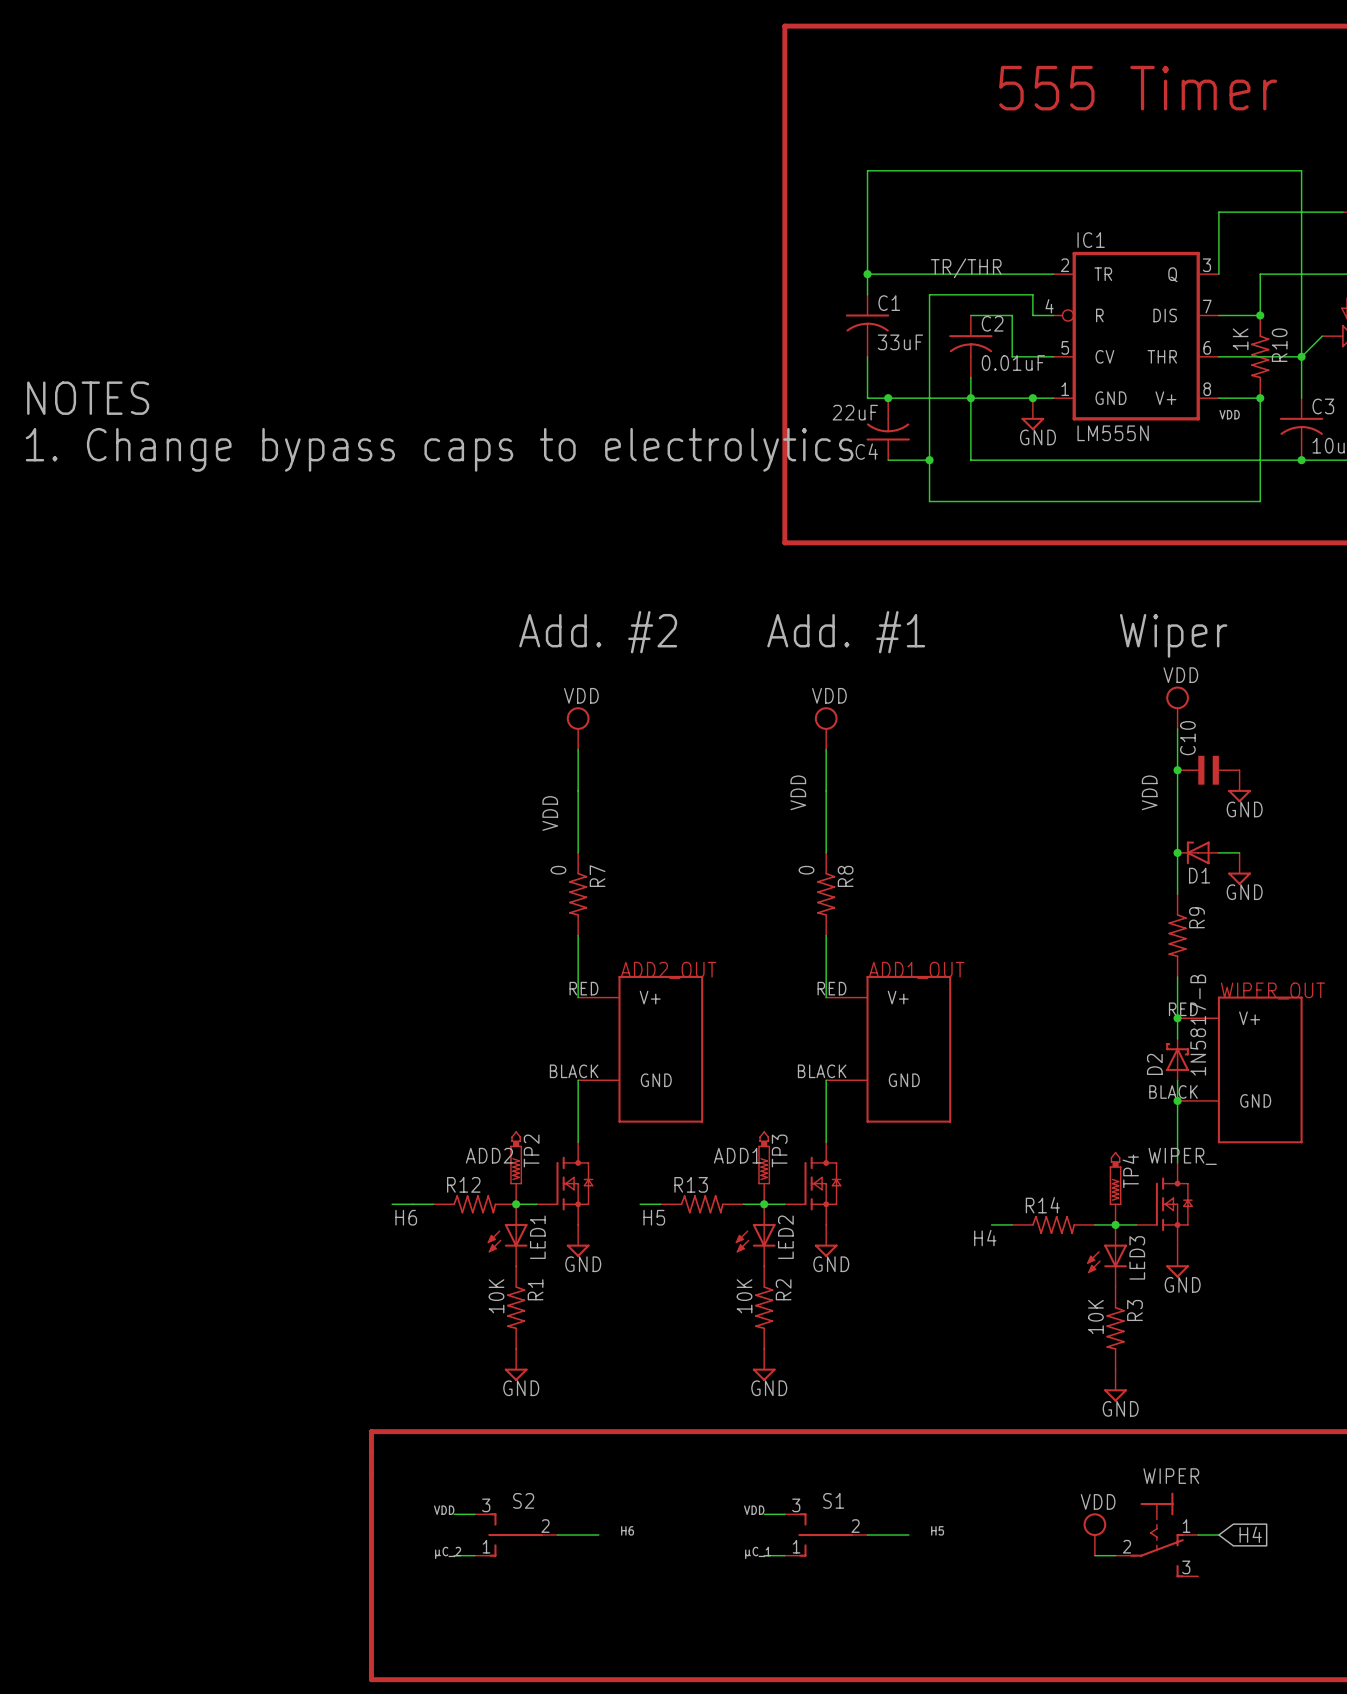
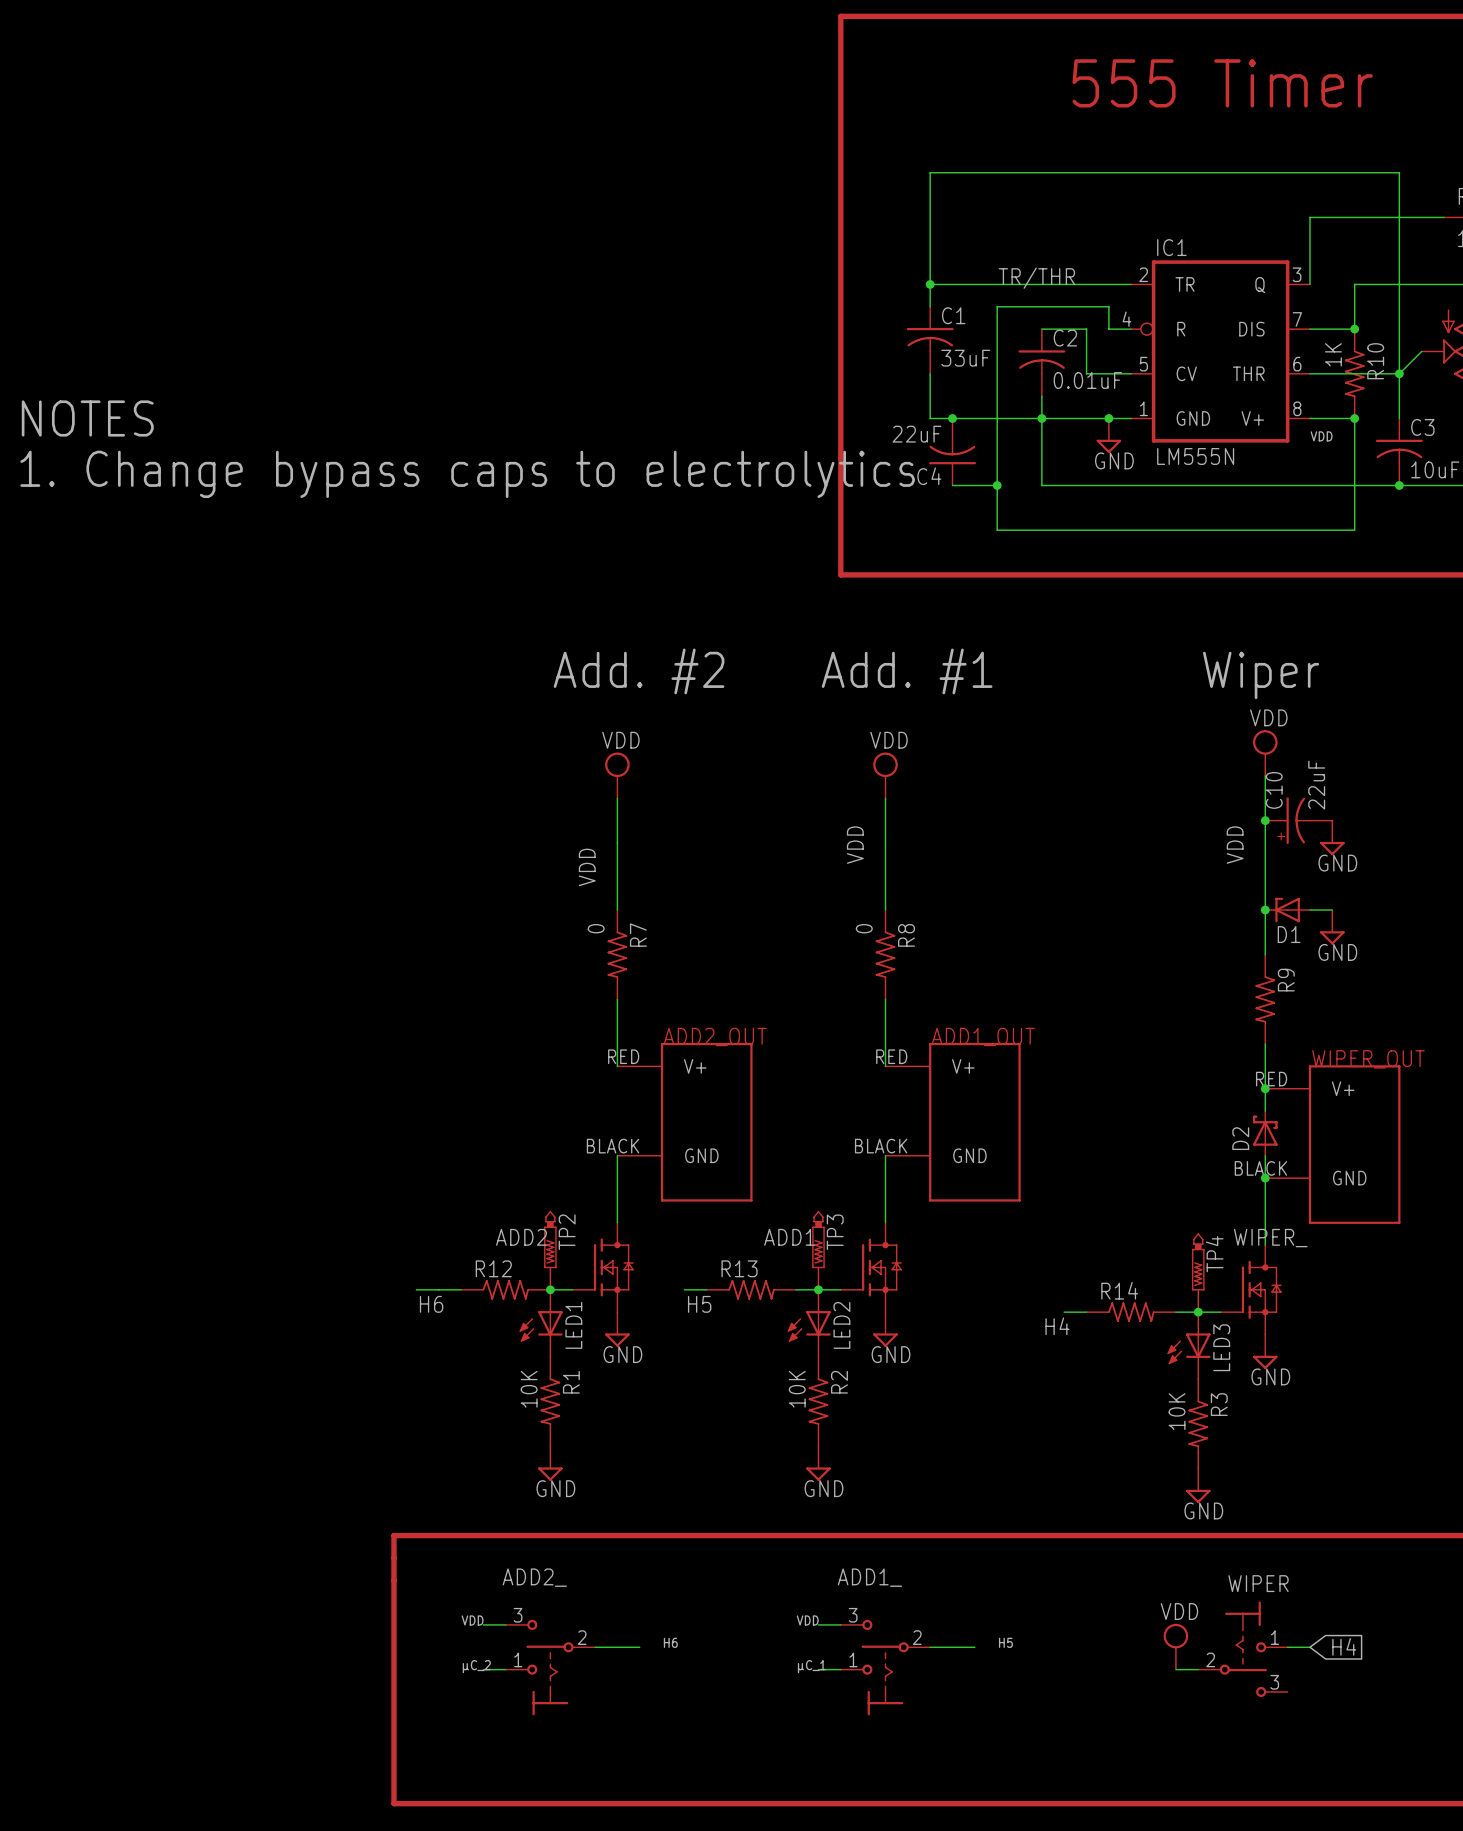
C10 value: none -> 22uF (1316, 785)
C10 symbol: [1177, 755, 1240, 785] -> [1265, 797, 1333, 845]
D2 value: 1N5817-B (1198, 1025) -> none
WIPER symbol: [1115, 1492, 1199, 1578] -> [1198, 1601, 1288, 1698]
S2: (516, 1535) -> none
S1: (826, 1535) -> none
ADD2_: none -> (550, 1667)
ADD1_: none -> (885, 1667)

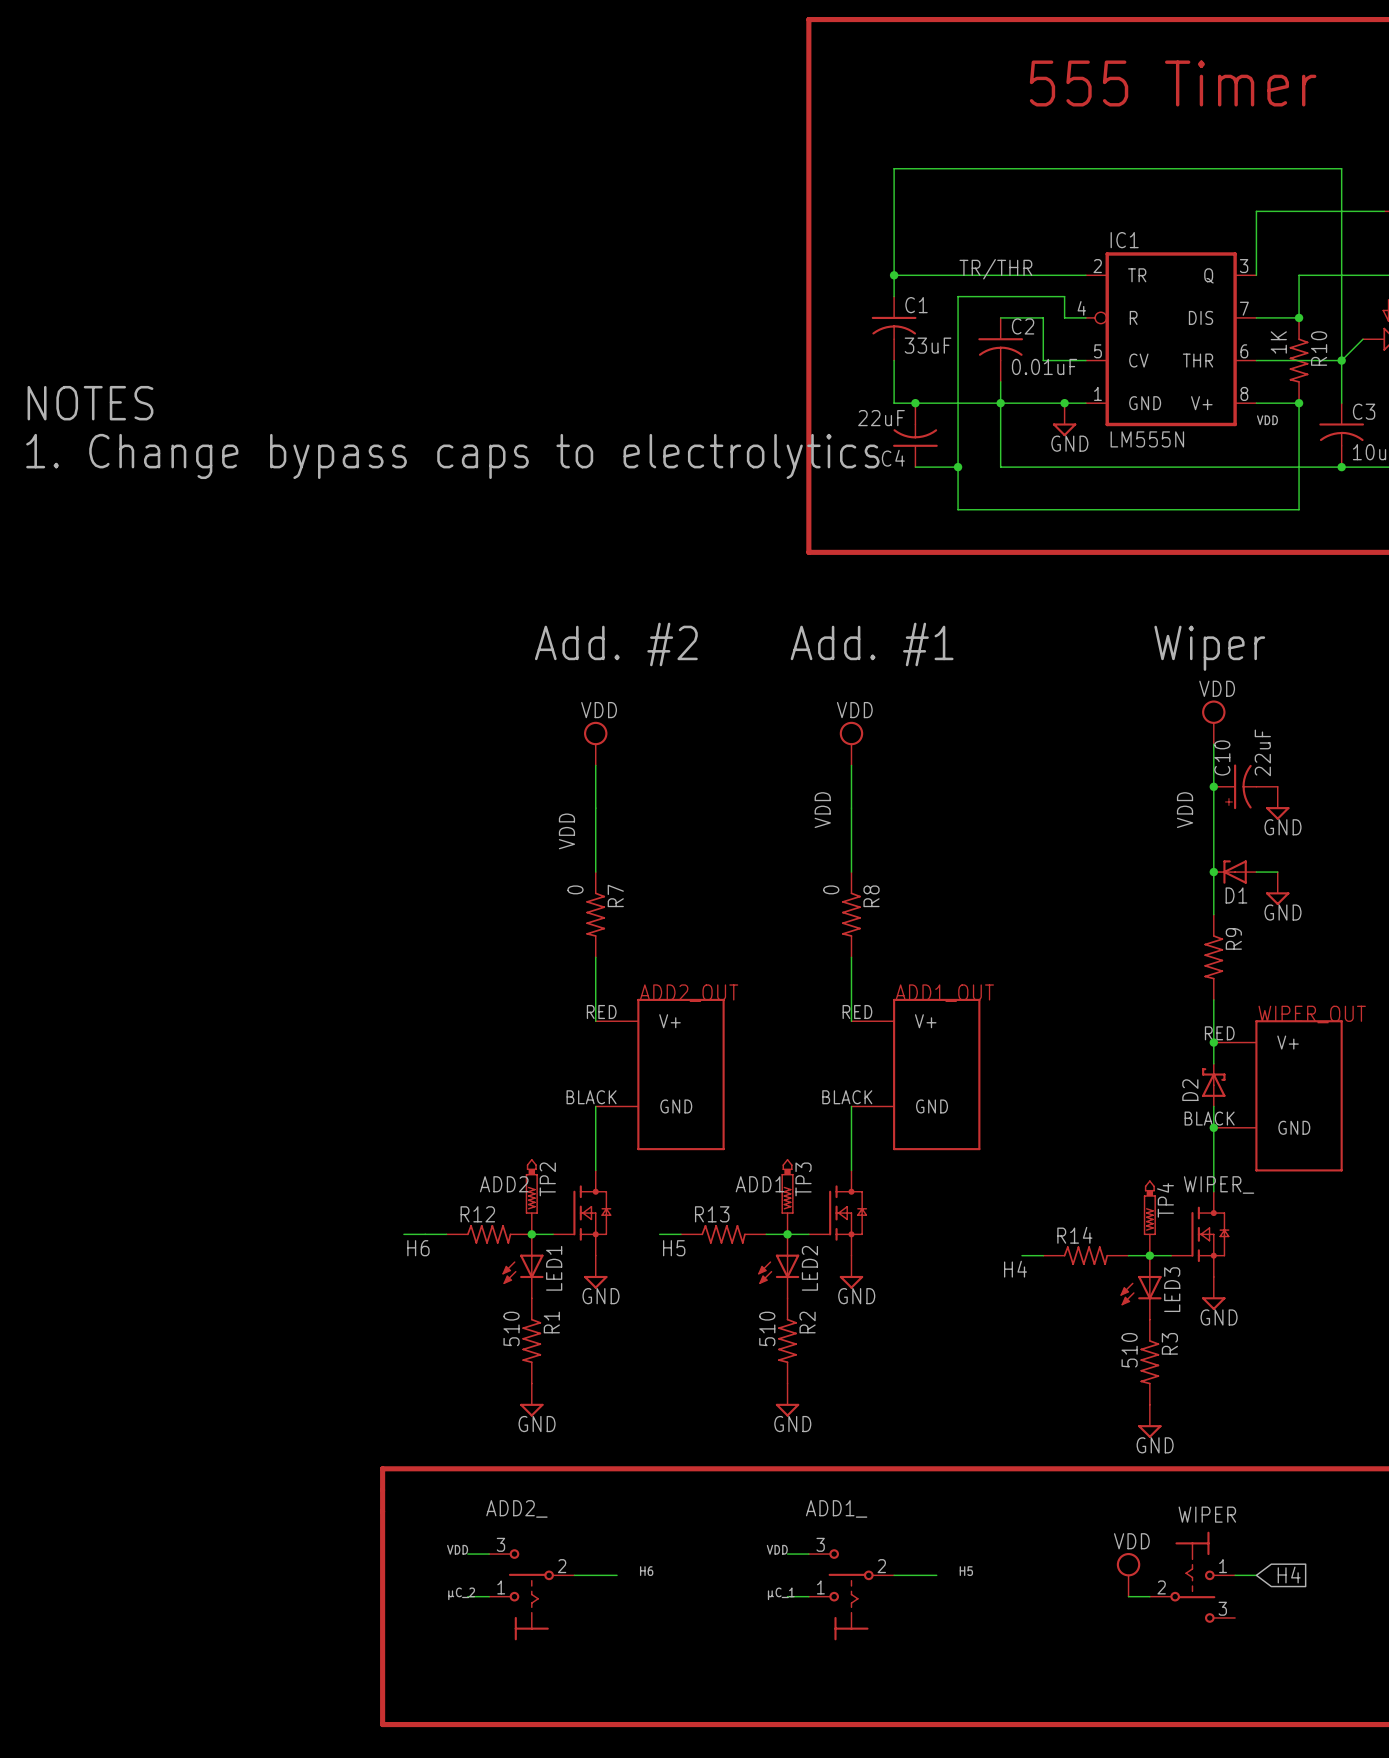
R1 value: 10K (529, 1389) -> 510 (511, 1328)
R2 value: 10K (797, 1389) -> 510 (767, 1328)
R3 value: 10K (1177, 1411) -> 510 (1129, 1350)

